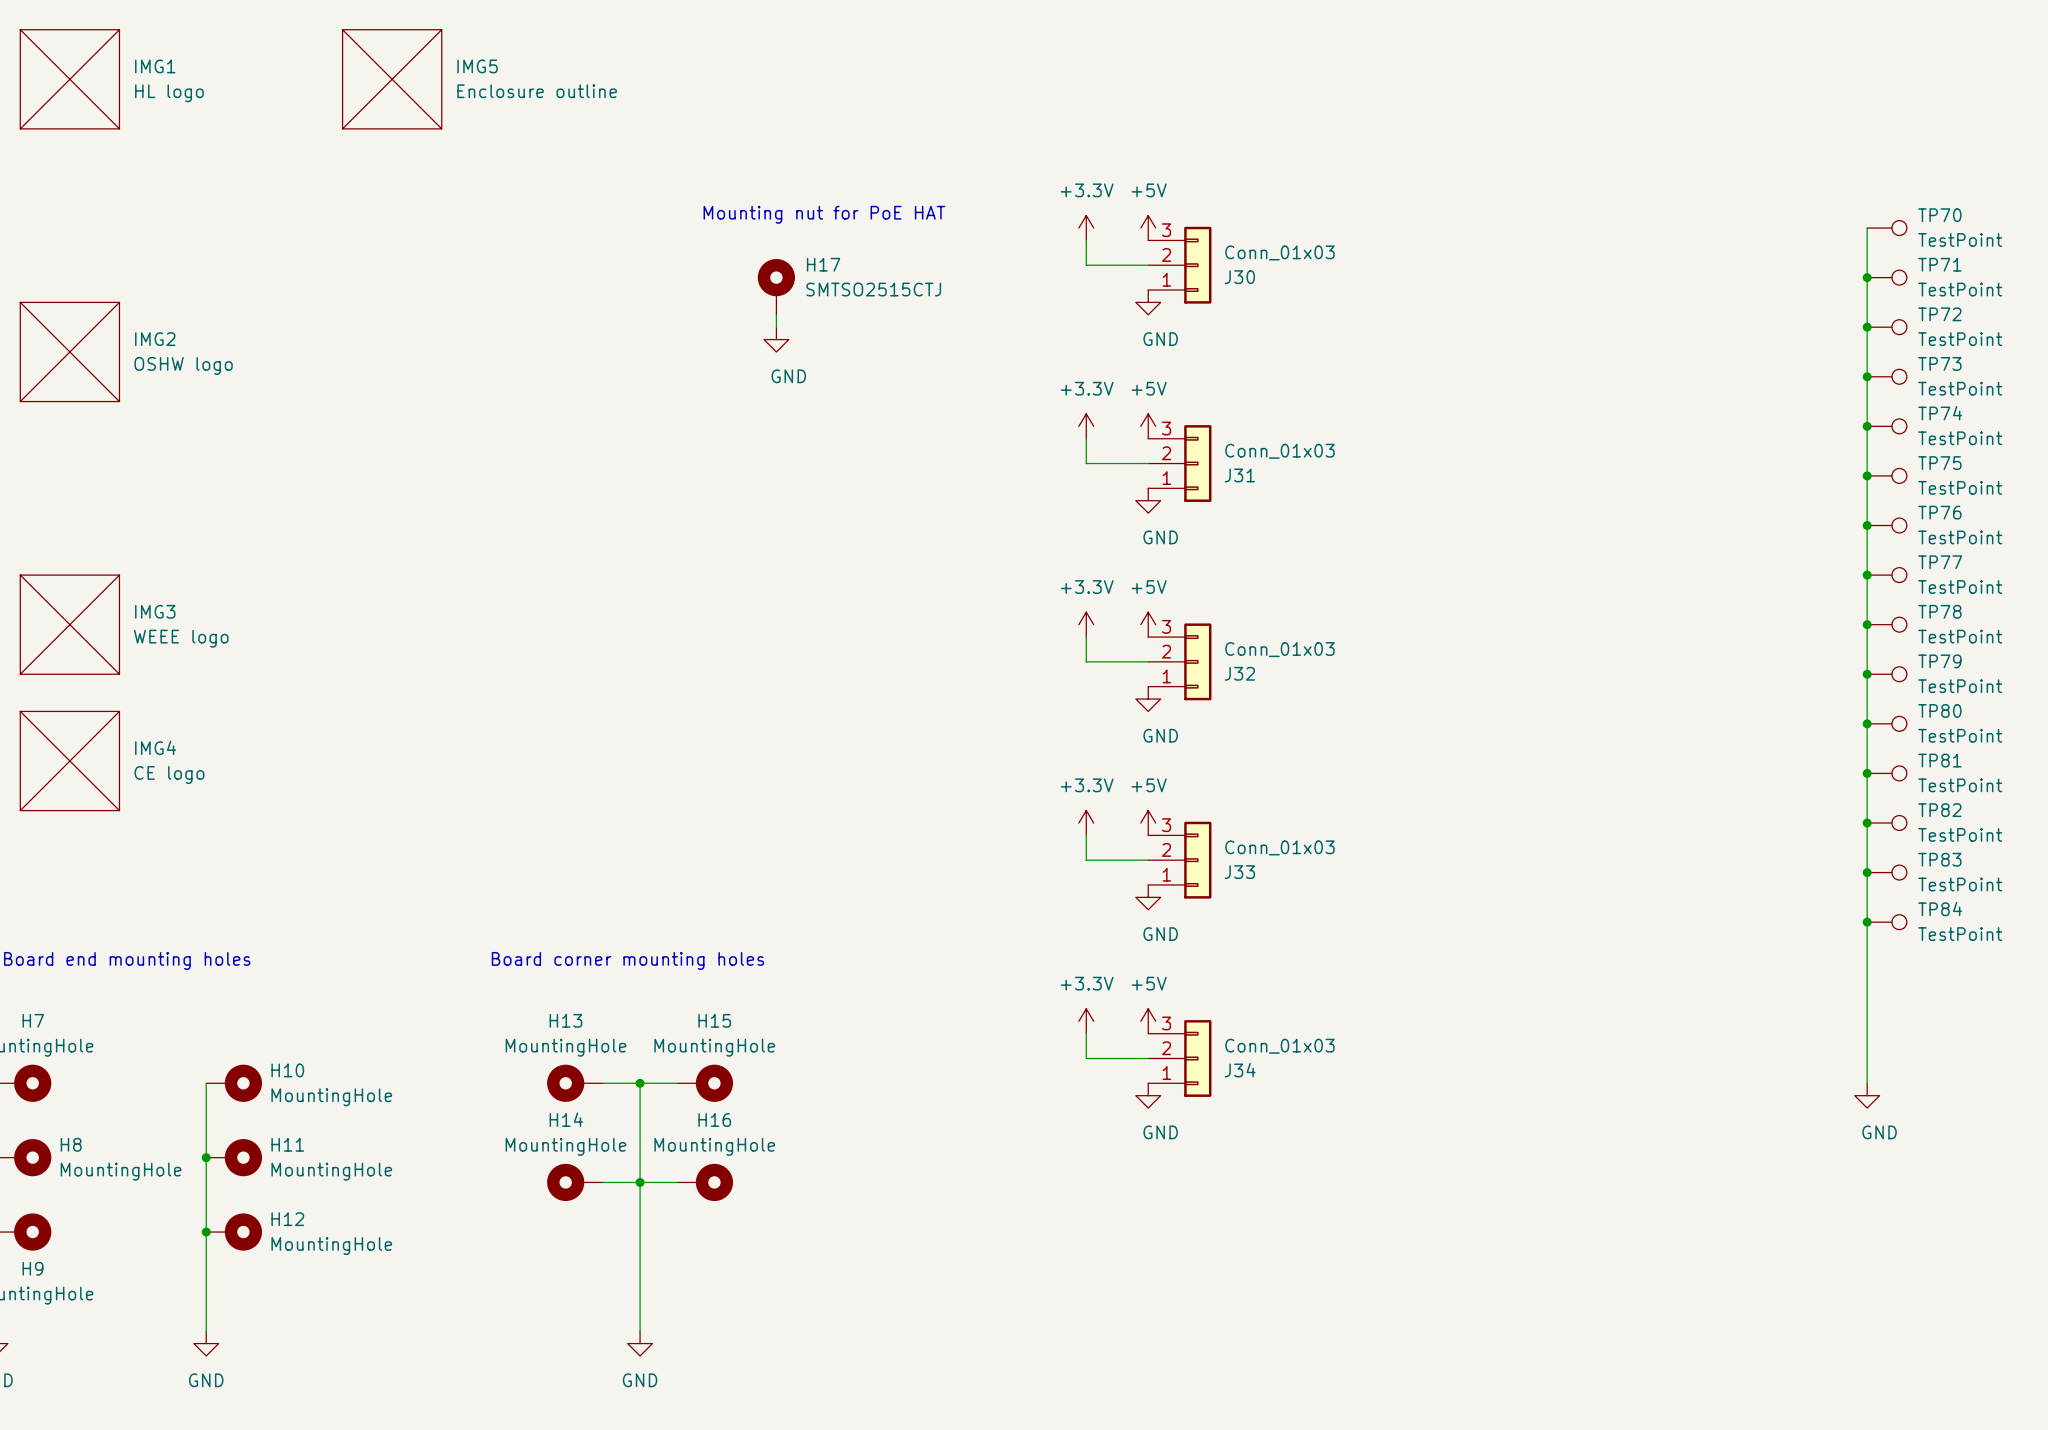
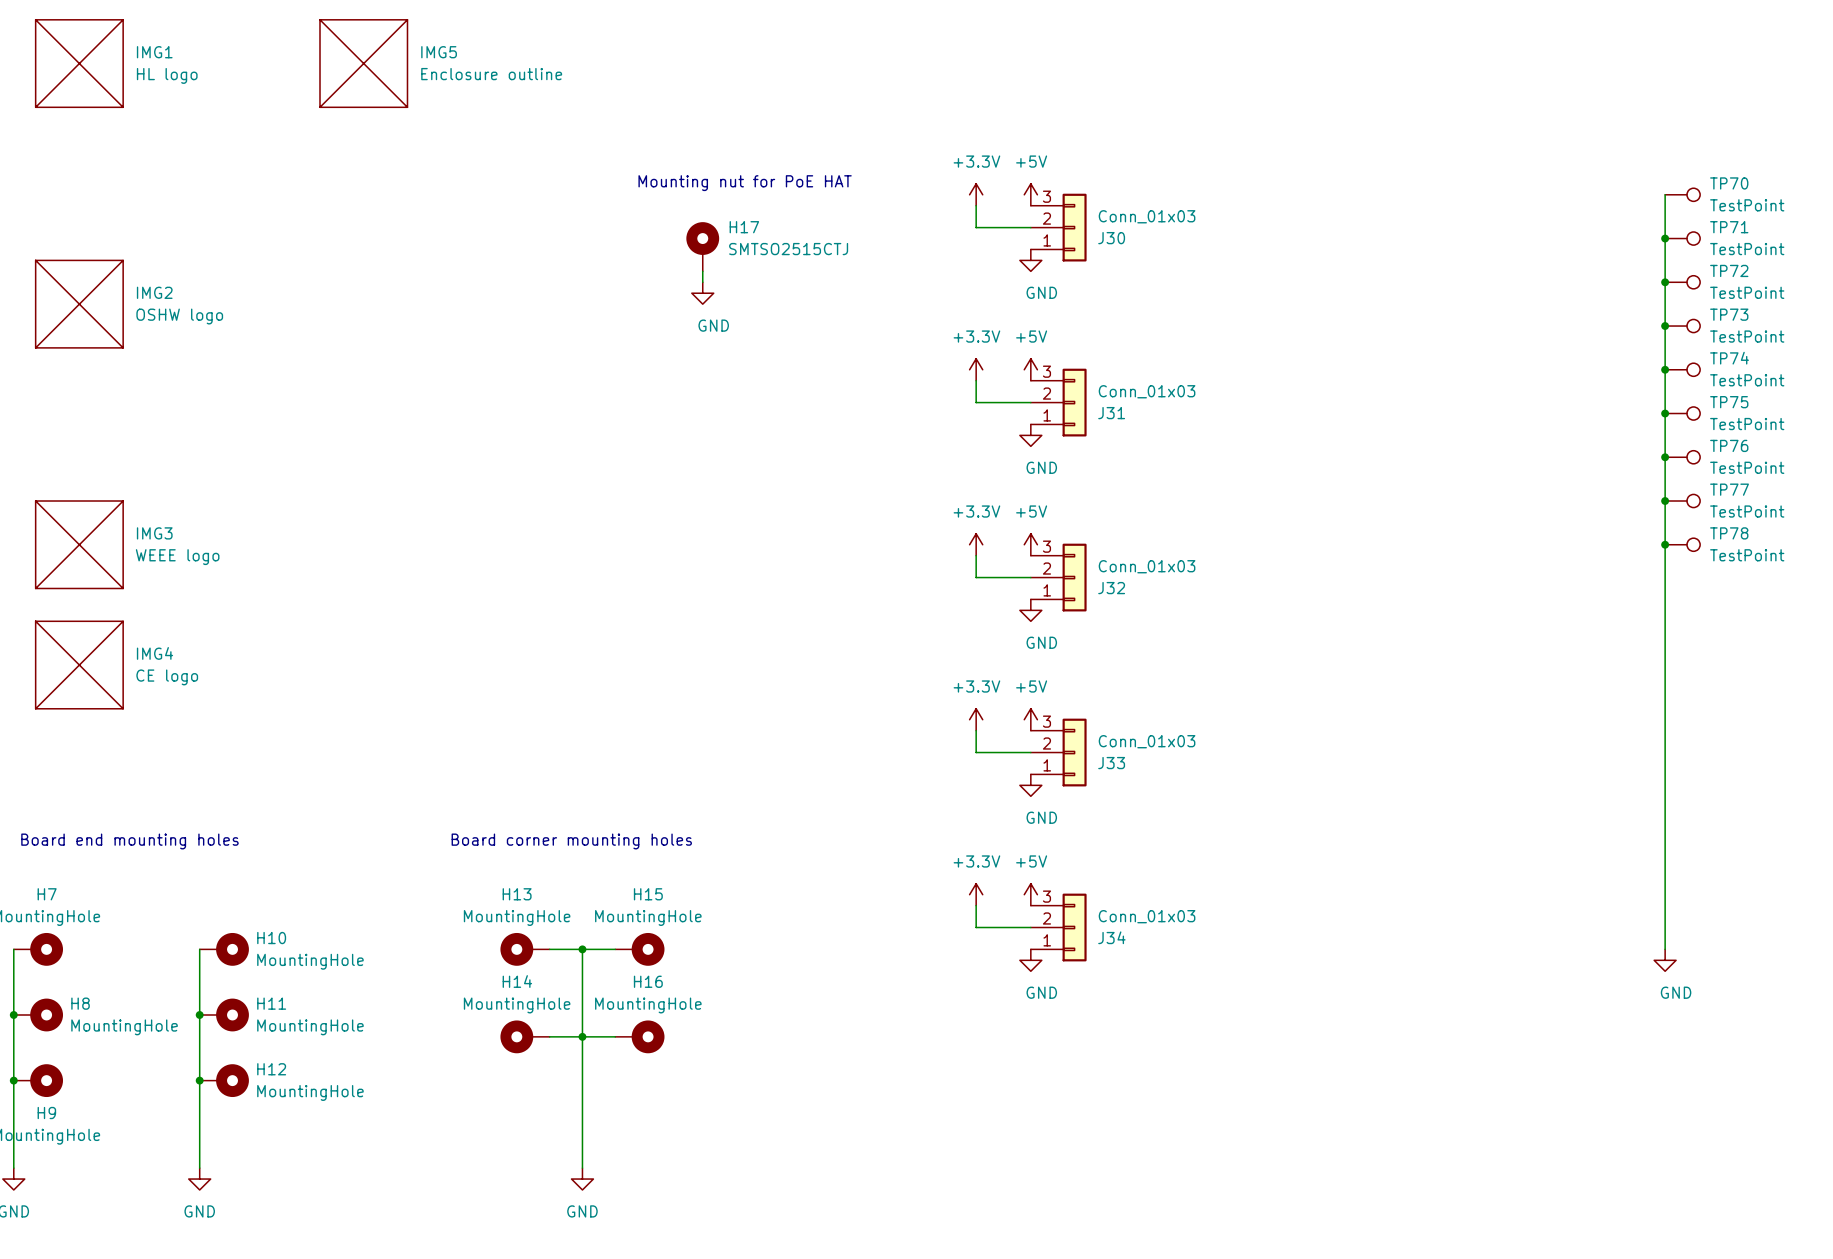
junction: (1867, 674) -> none
TP79: TestPoint (1887, 674) -> none
junction: (1867, 723) -> none
TP80: TestPoint (1887, 723) -> none
junction: (1867, 773) -> none
TP81: TestPoint (1887, 773) -> none
junction: (1867, 822) -> none
TP82: TestPoint (1887, 822) -> none
junction: (1867, 872) -> none
TP83: TestPoint (1887, 872) -> none
junction: (1867, 922) -> none
TP84: TestPoint (1887, 922) -> none

